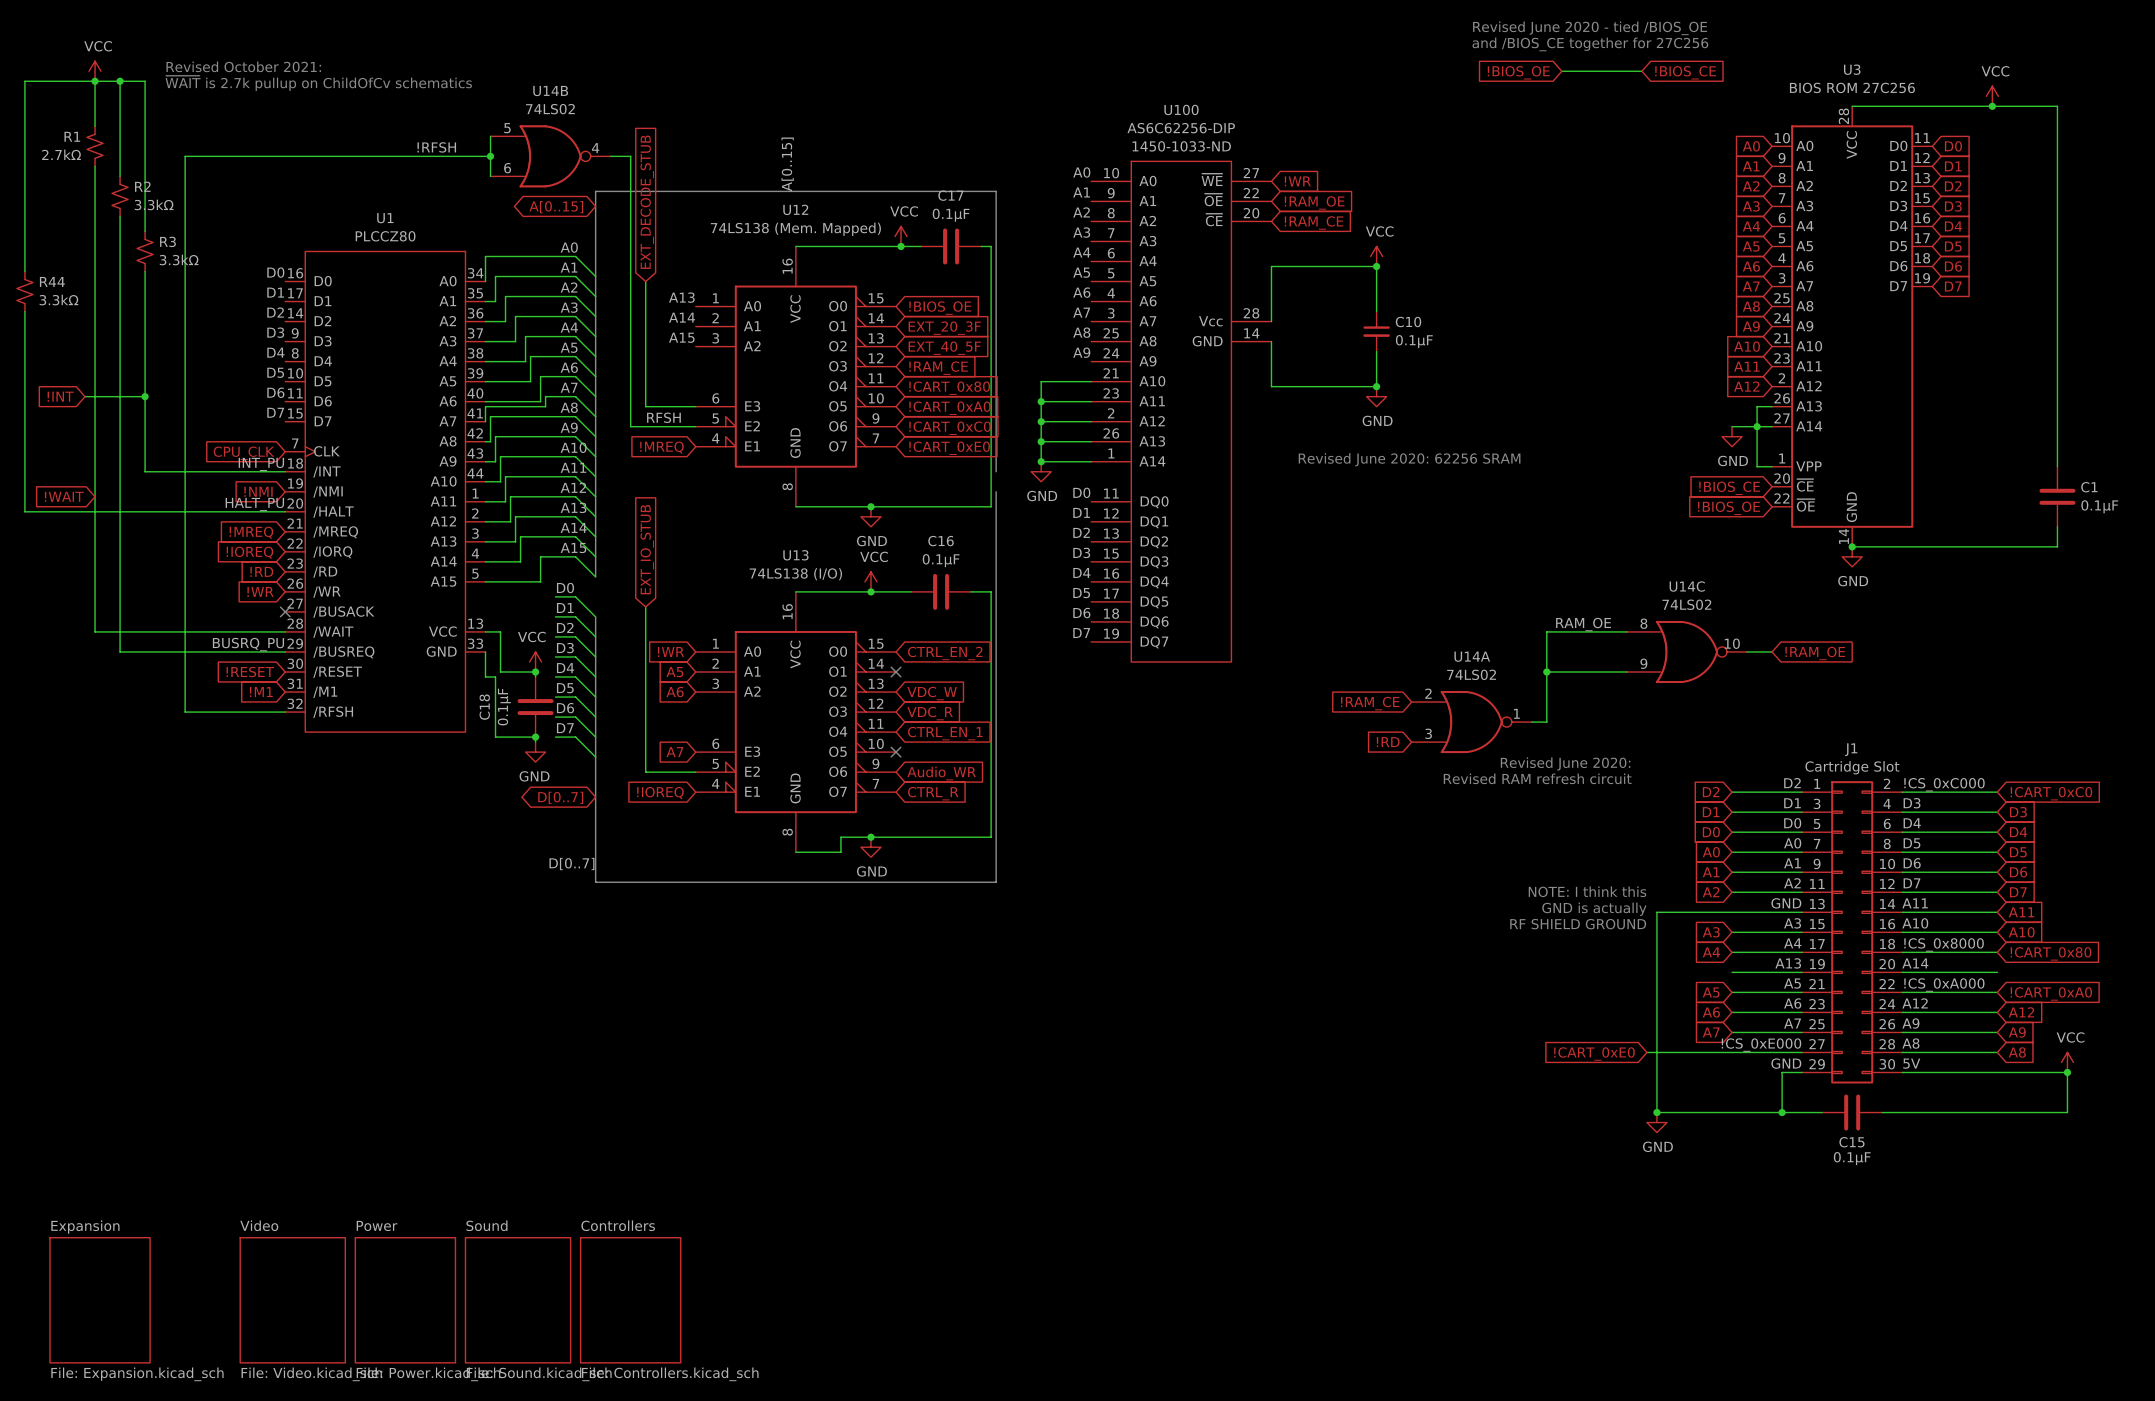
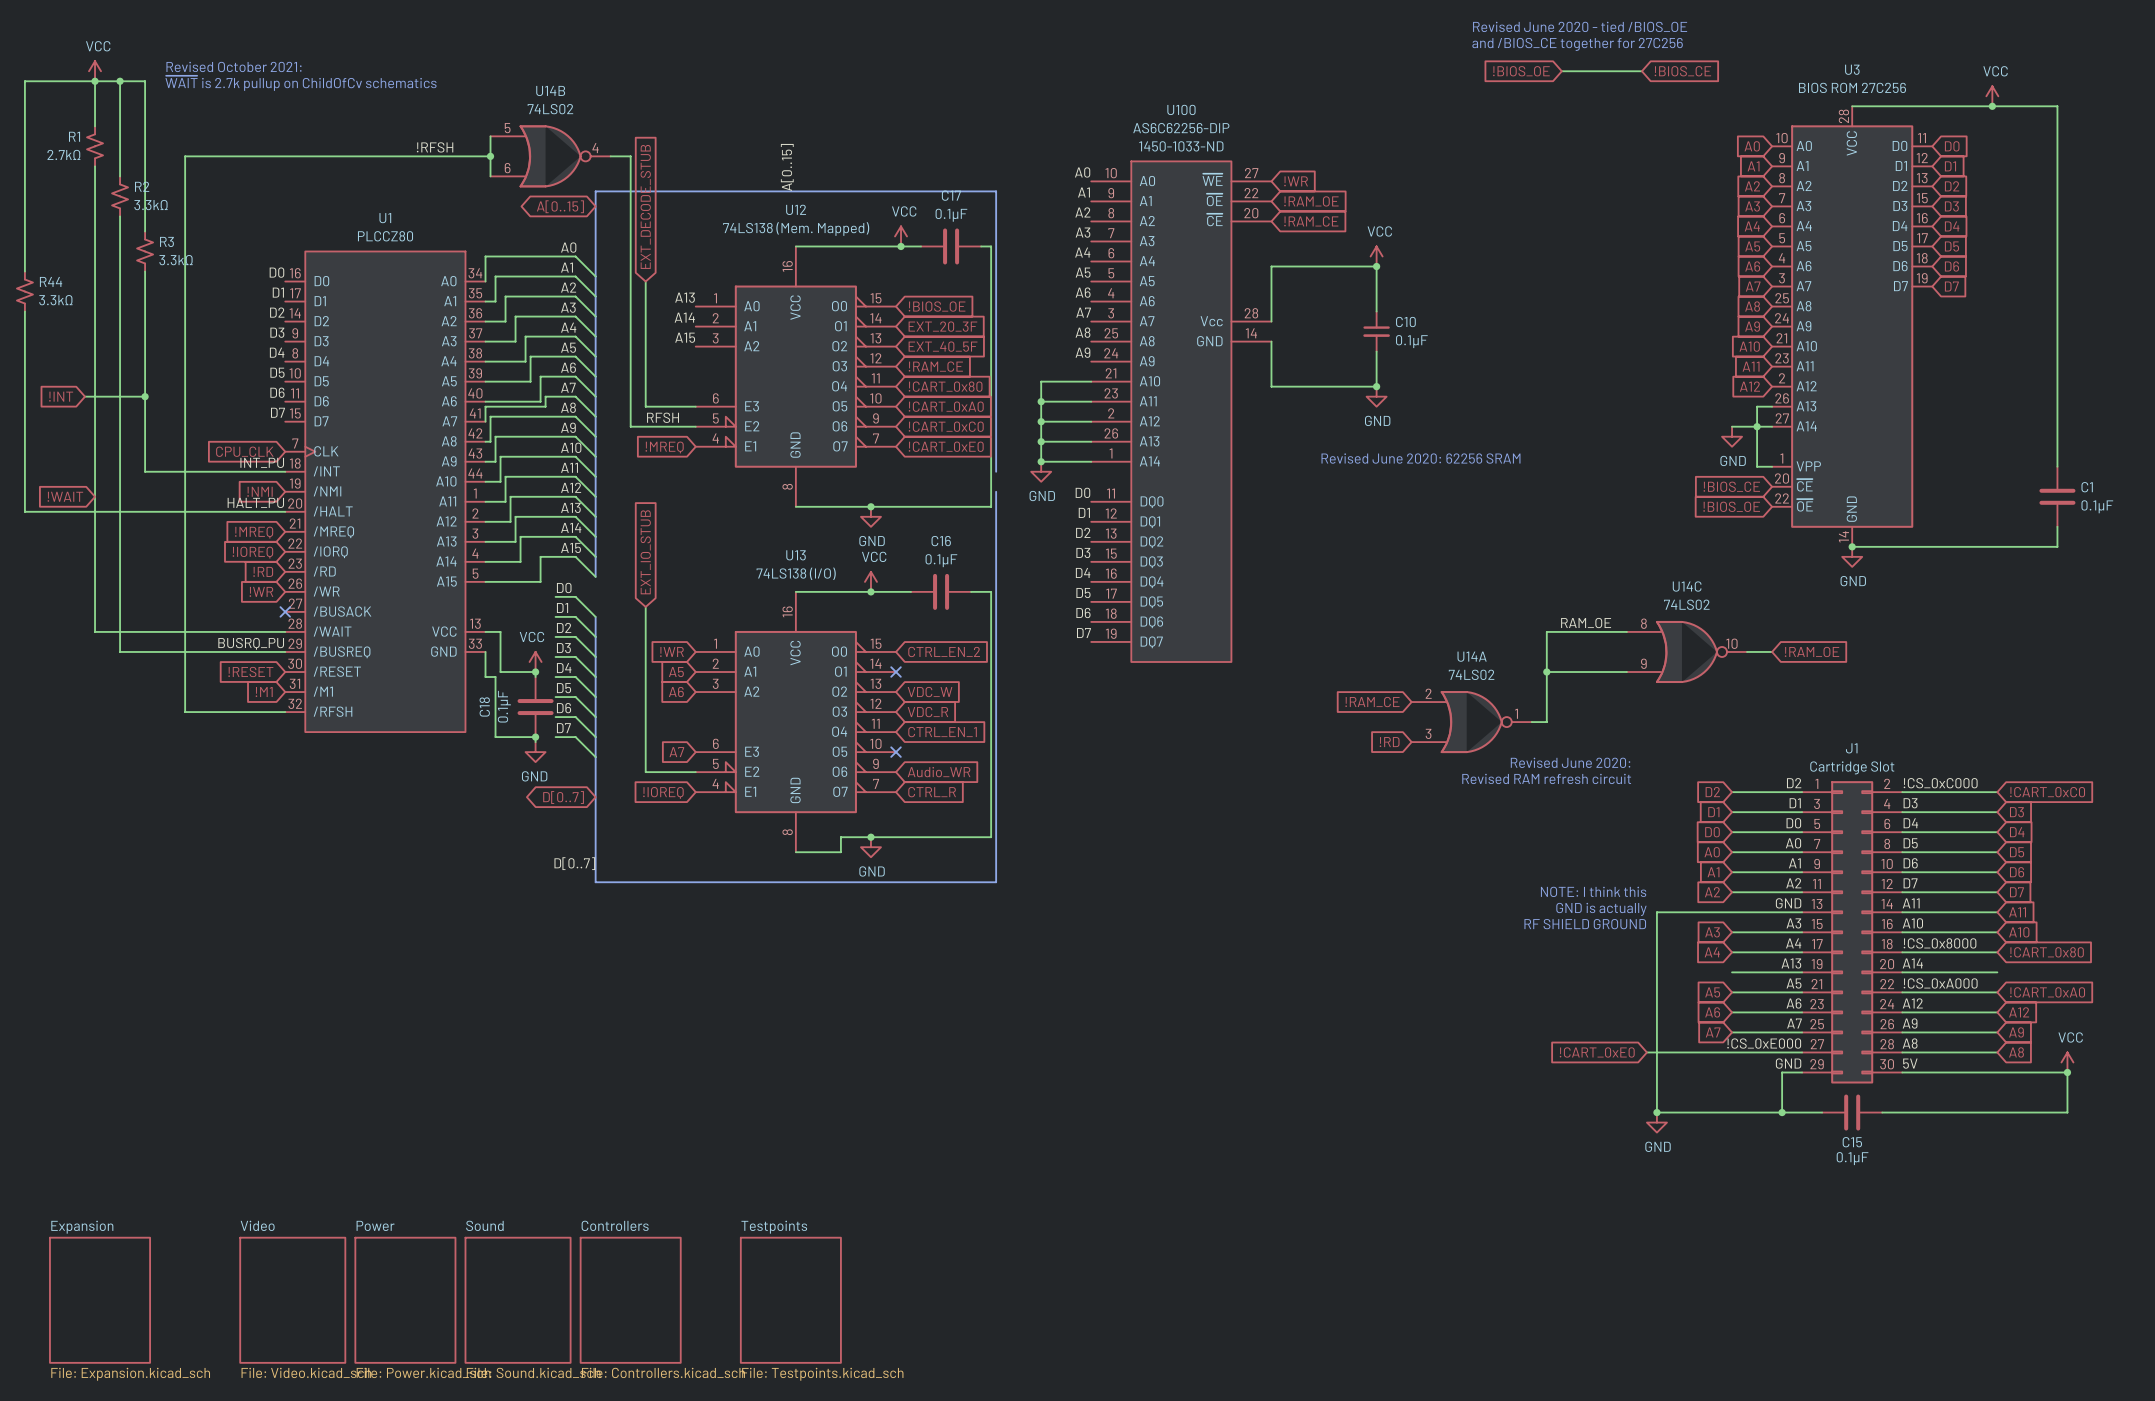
sheet Testpoints: none -> File: Testpoints.kicad_sch (790, 1300)

